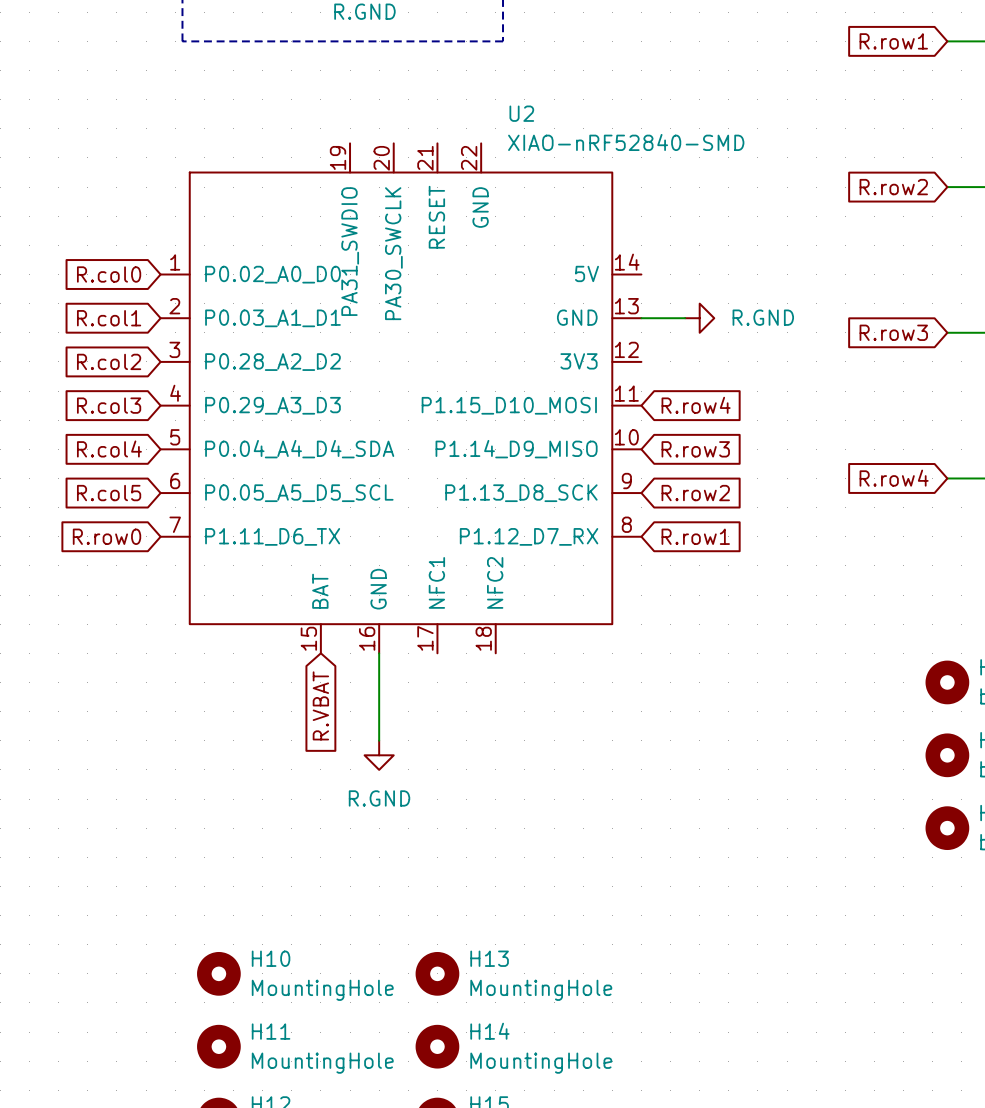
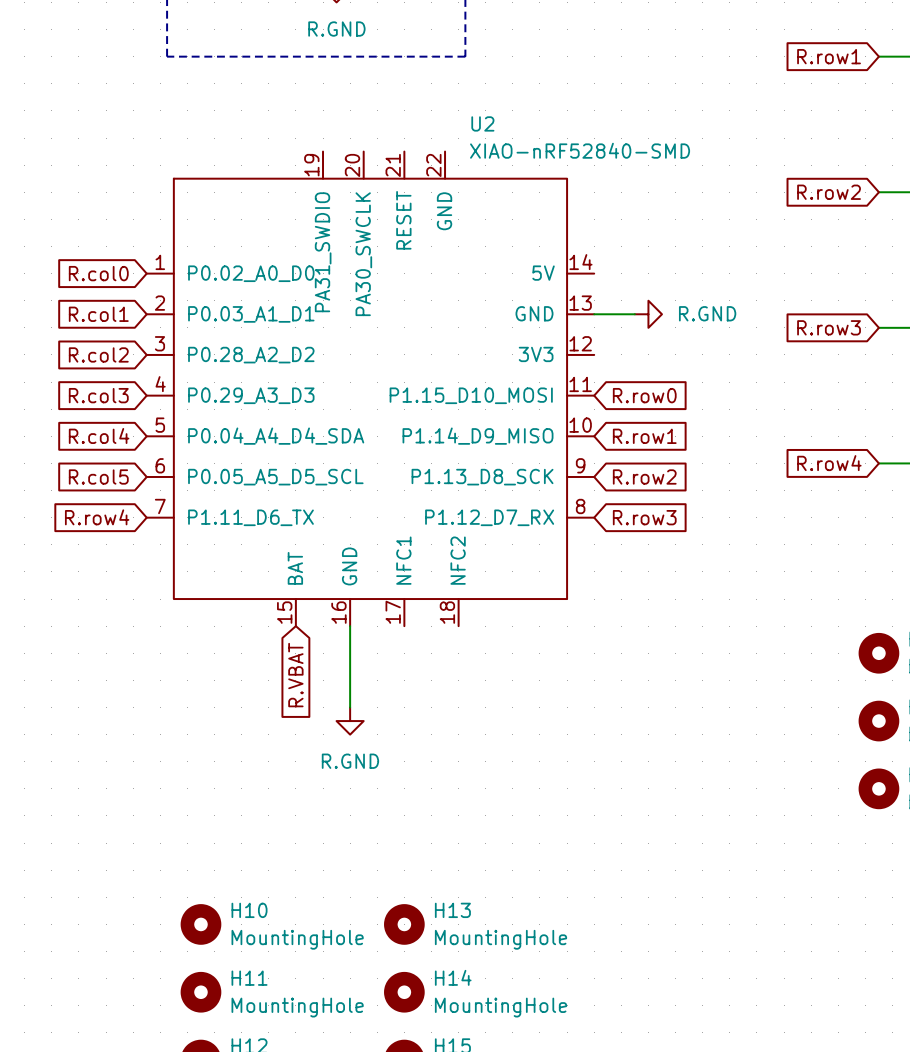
global label: R.row4 (696, 405) -> R.row0 (644, 395)
global label: R.row3 (695, 449) -> R.row1 (644, 436)
global label: R.row0 (107, 536) -> R.row4 (97, 517)
global label: R.row1 (695, 536) -> R.row3 (644, 517)

